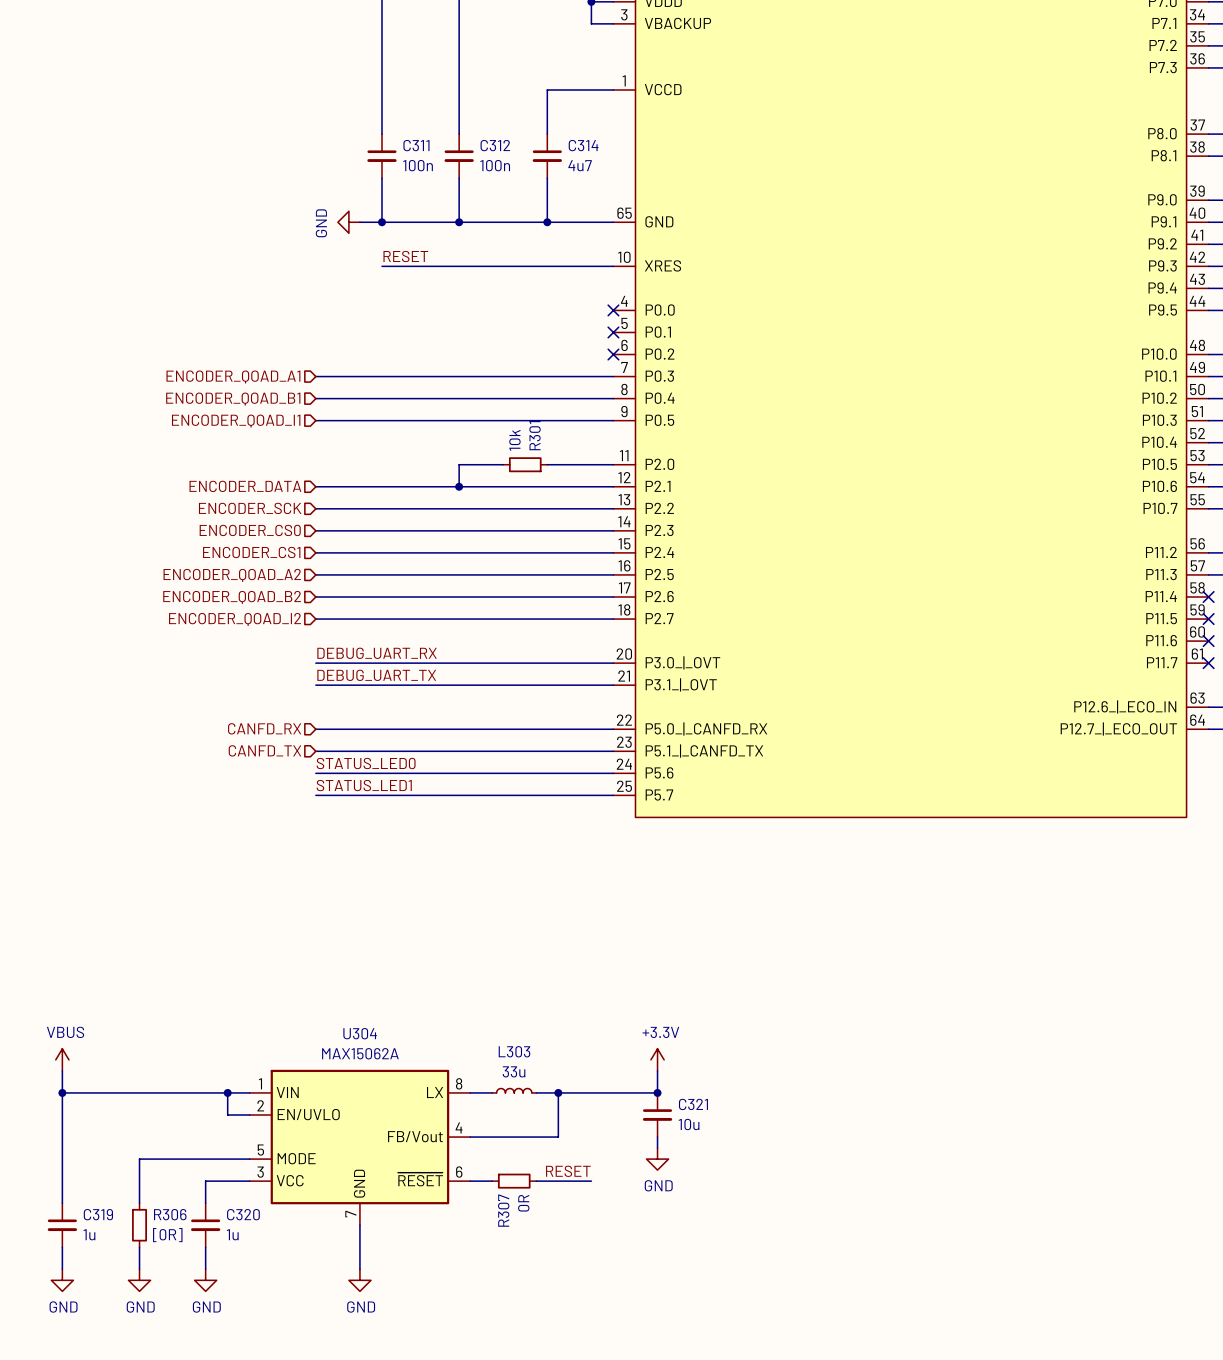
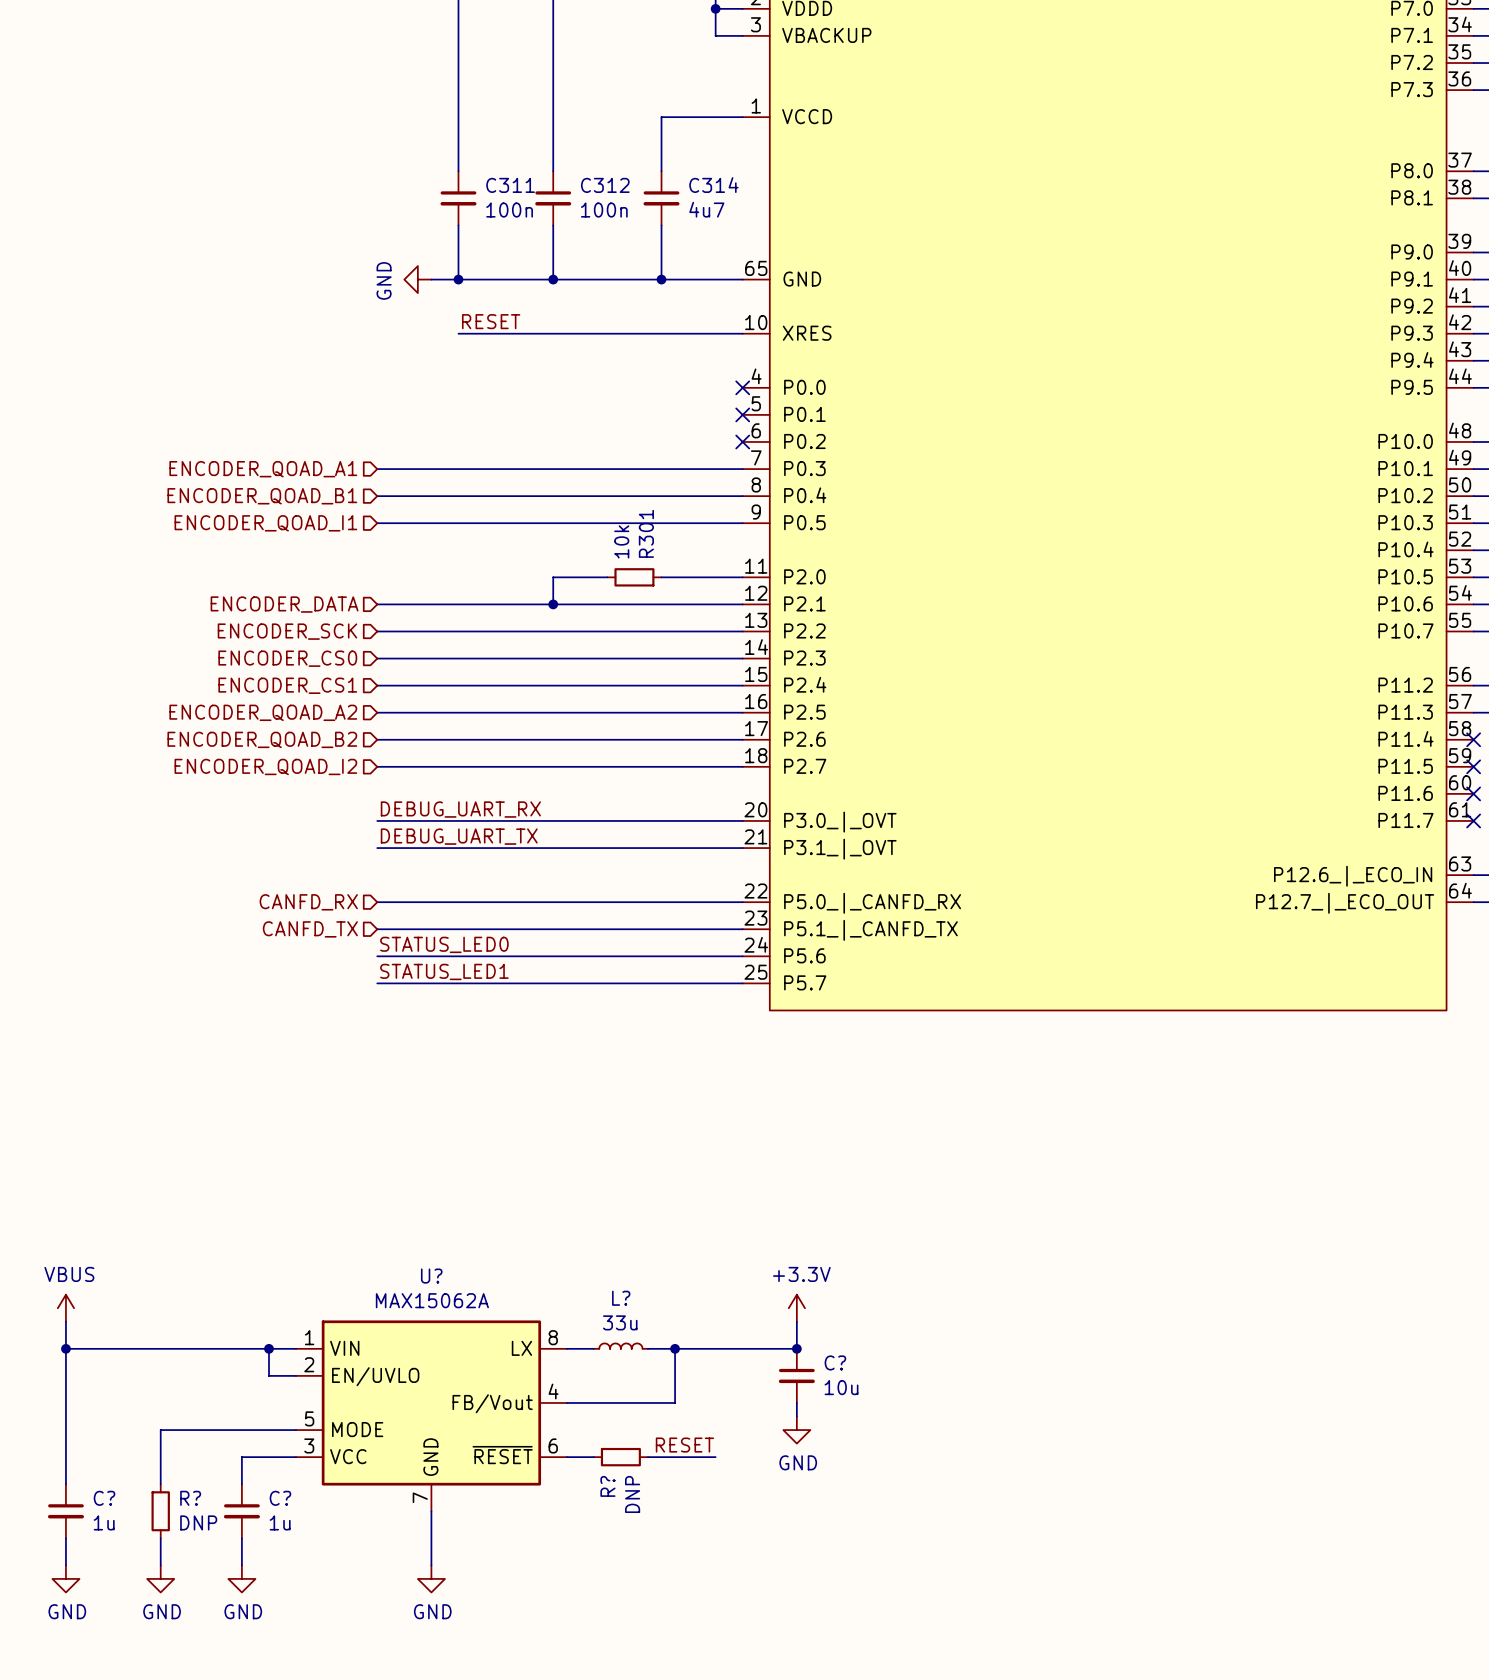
U304 name: U304 (360, 1033) -> U? (431, 1276)
L303 name: L303 (514, 1051) -> L? (621, 1298)
C321 name: C321 (693, 1104) -> C? (835, 1362)
R307 value: 0R (523, 1203) -> DNP (632, 1494)
R307 name: R307 (503, 1210) -> R? (607, 1486)
C319 name: C319 (98, 1214) -> C? (104, 1498)
R306 name: R306 (170, 1214) -> R? (190, 1498)
C320 name: C320 (243, 1214) -> C? (280, 1498)
R306 value: [0R] (167, 1235) -> DNP (198, 1522)

